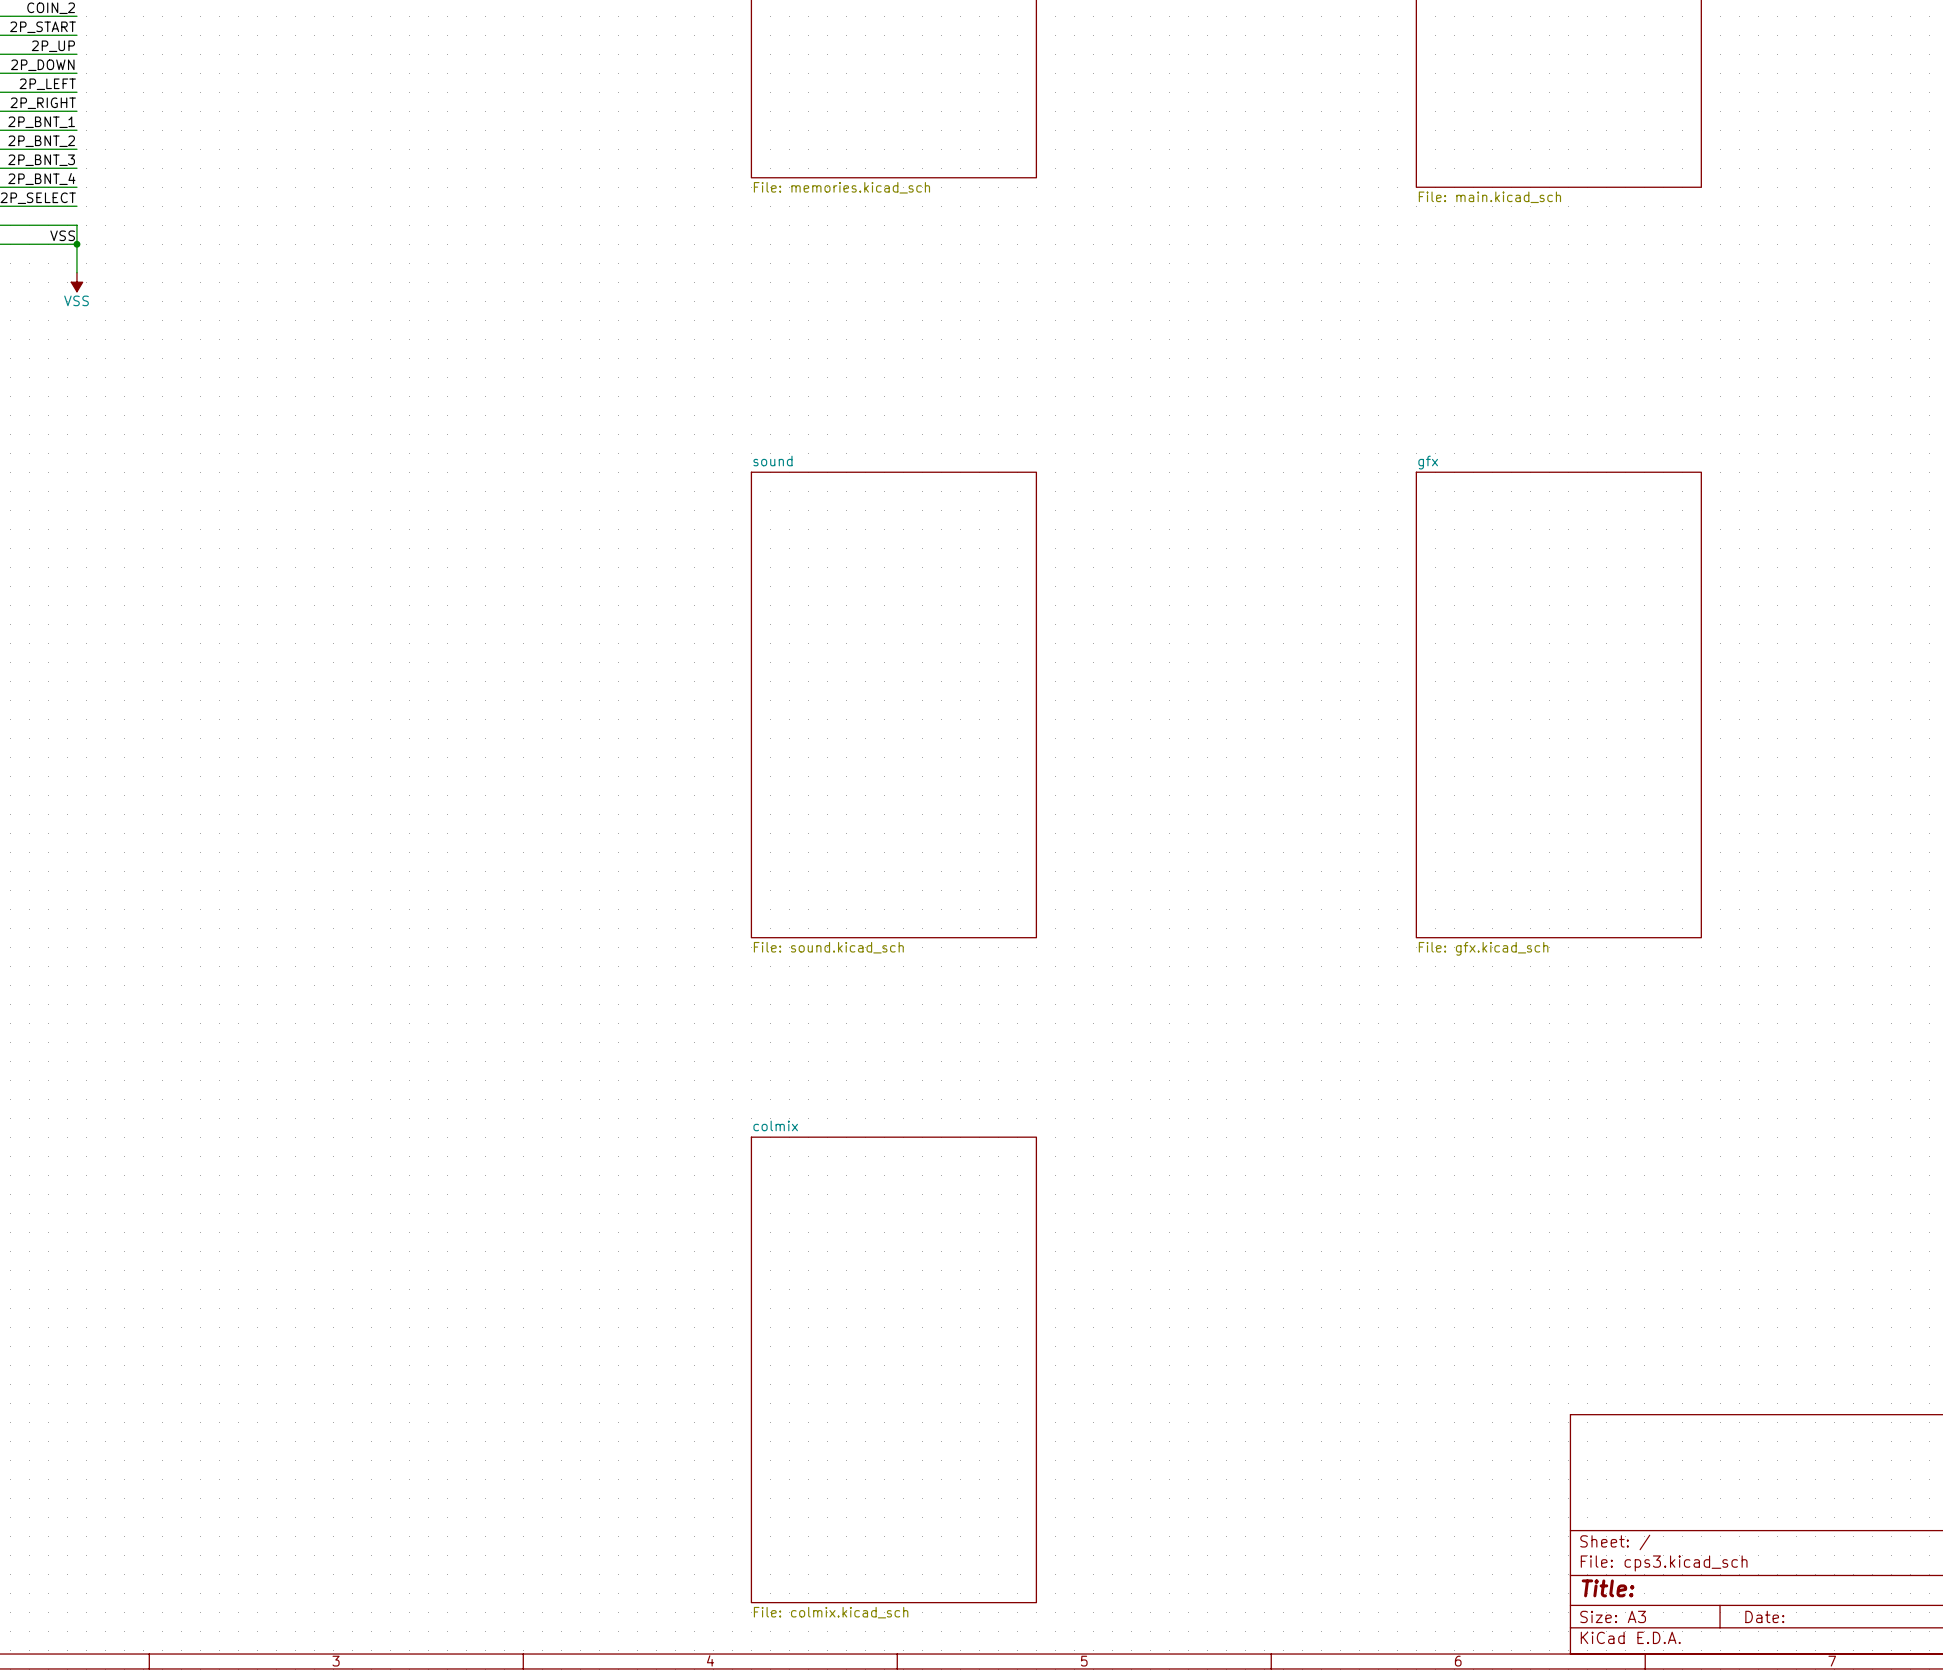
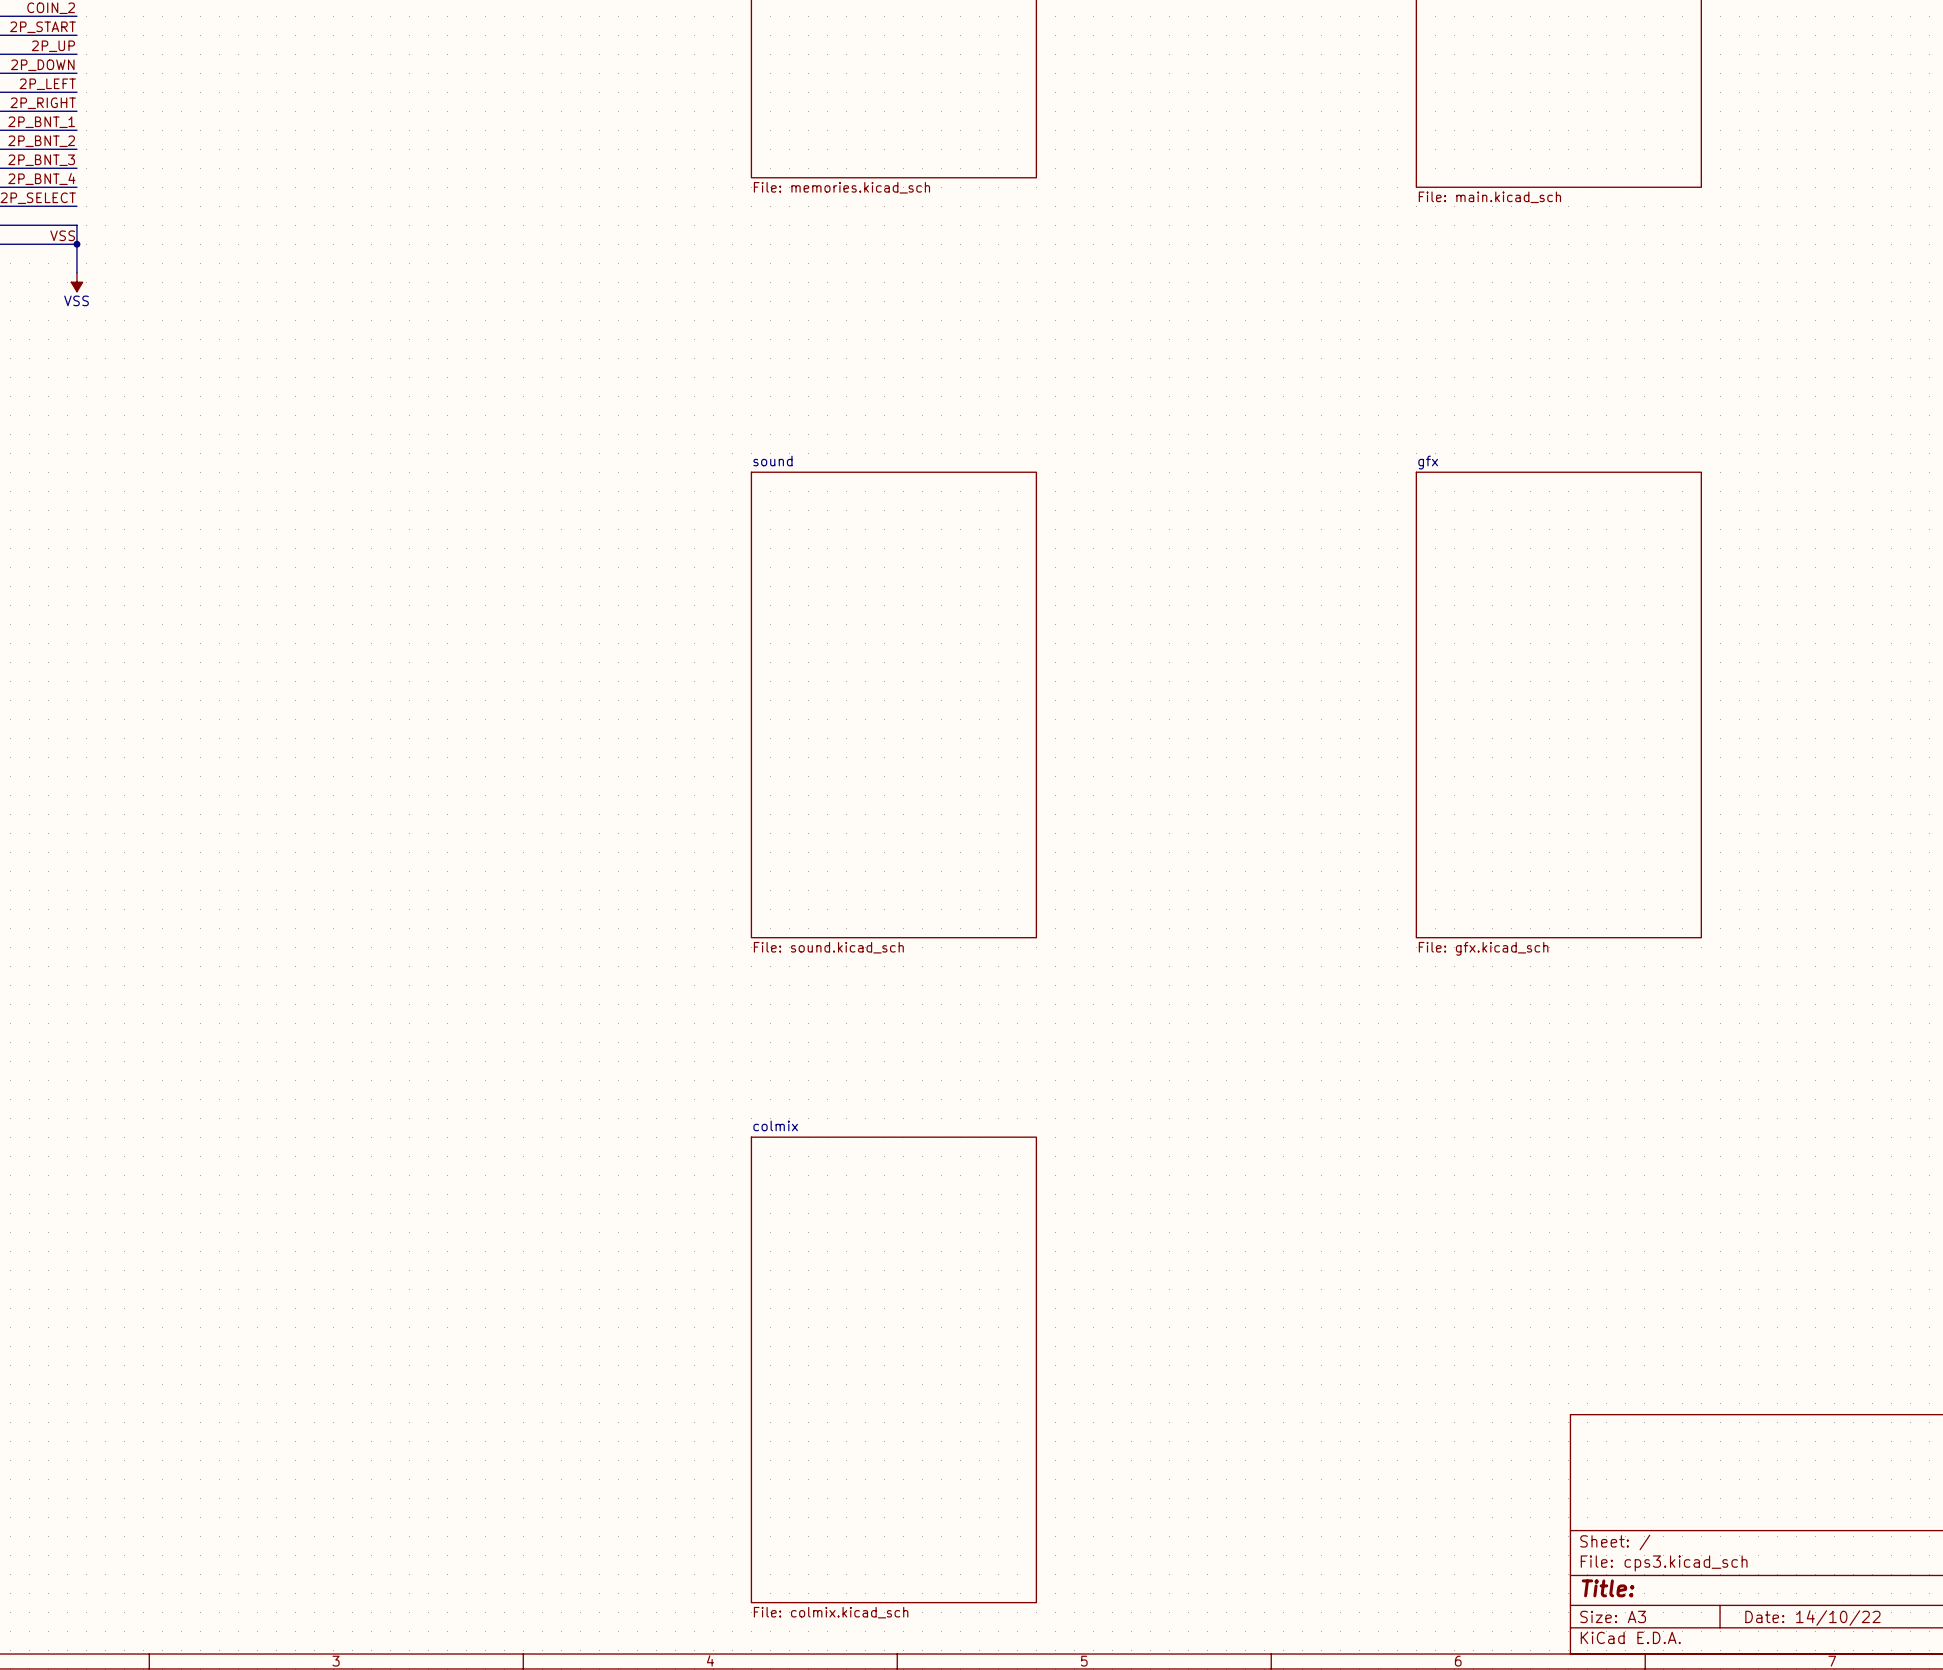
title block: Date: (1764, 1616) -> Date: 14/10/22 (1812, 1618)

